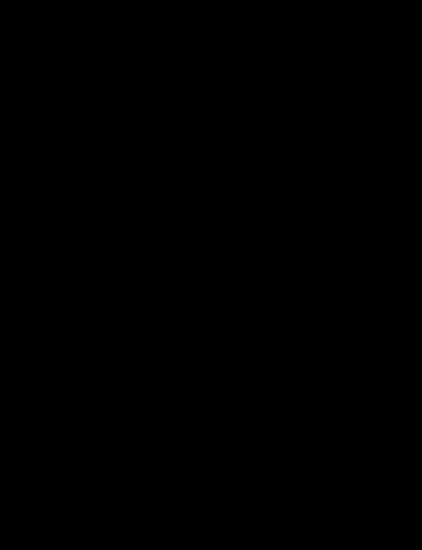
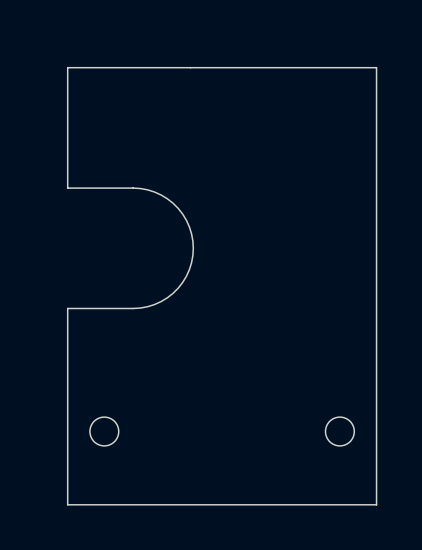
board edge: none -> (67, 67) (67, 188) (140, 188) (161, 194) (173, 203) (182, 214) (191, 233) (193, 248) (191, 262) (186, 276) (178, 288) (161, 301) (140, 308) (67, 308) (67, 504) (376, 504) (376, 67) (67, 67)
round board edge: none -> [89, 416, 120, 447]
round board edge: none -> [324, 416, 355, 447]

